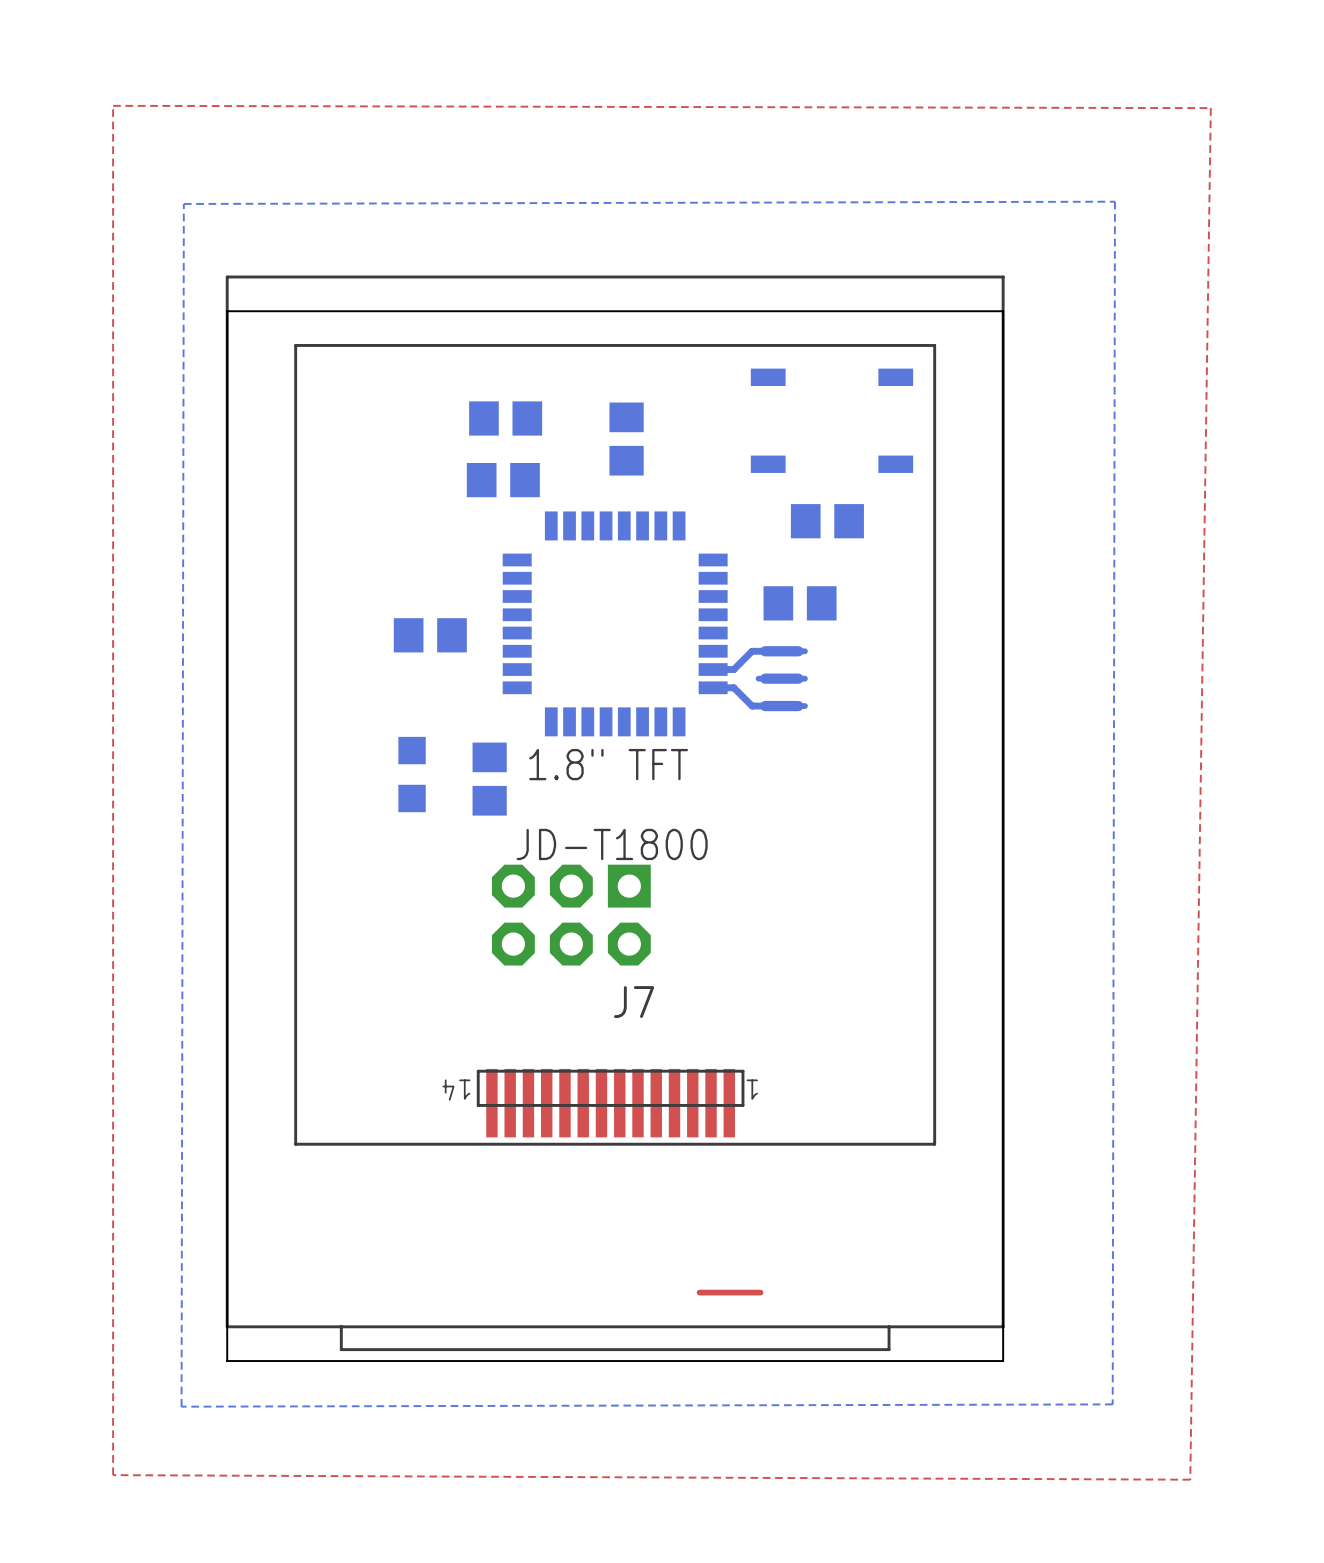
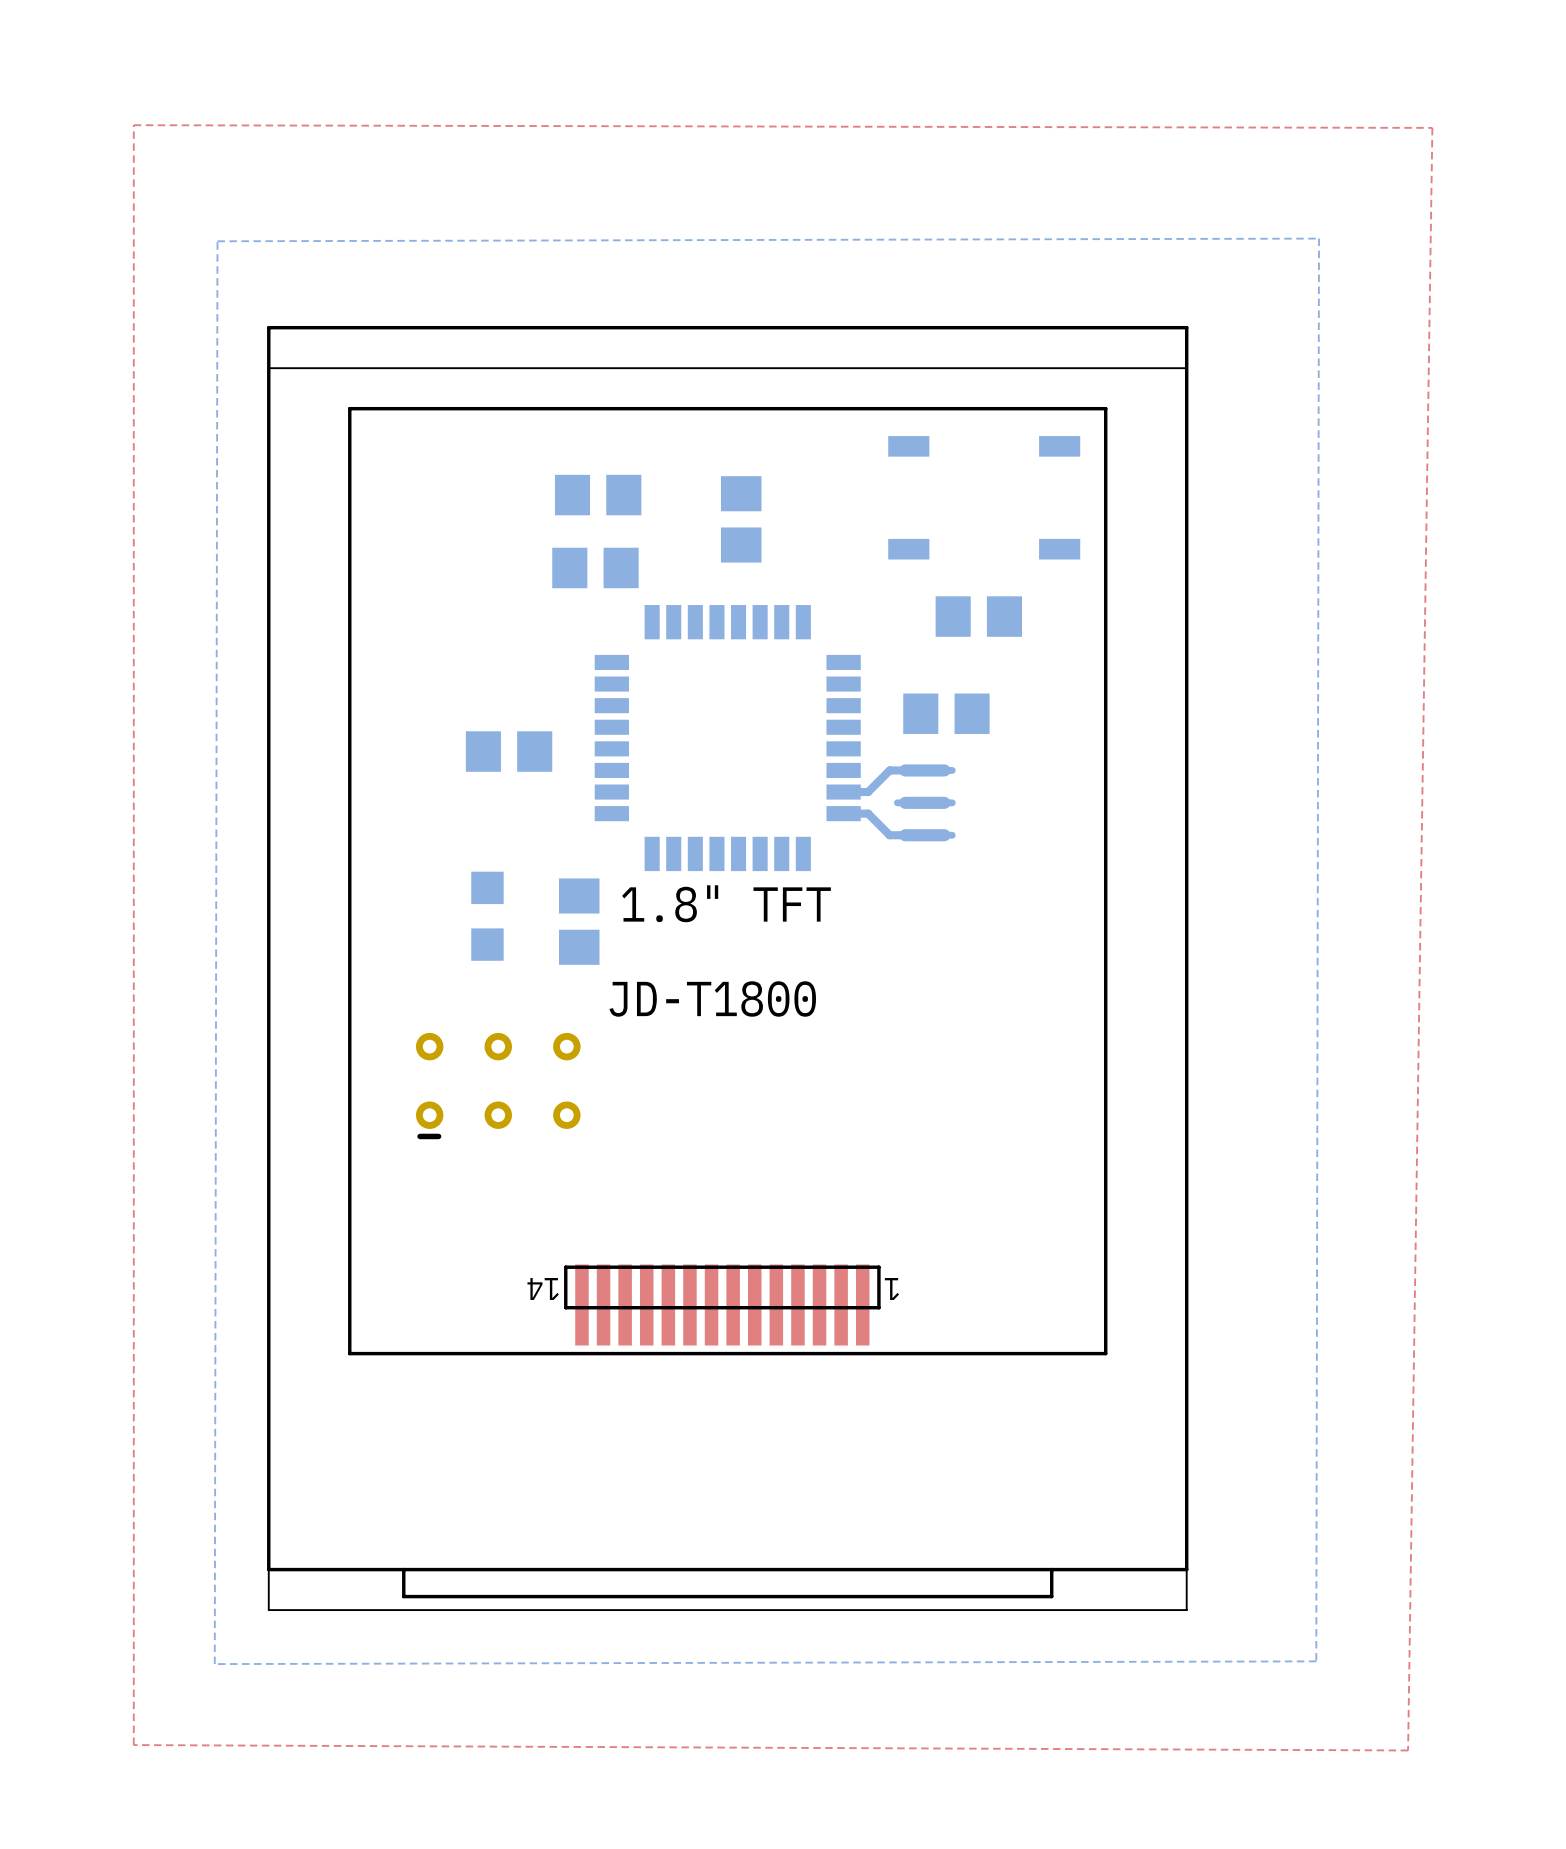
J7: (571, 915) -> none
part: none -> (498, 1086)
top track: (699, 1292) (760, 1292) -> none

